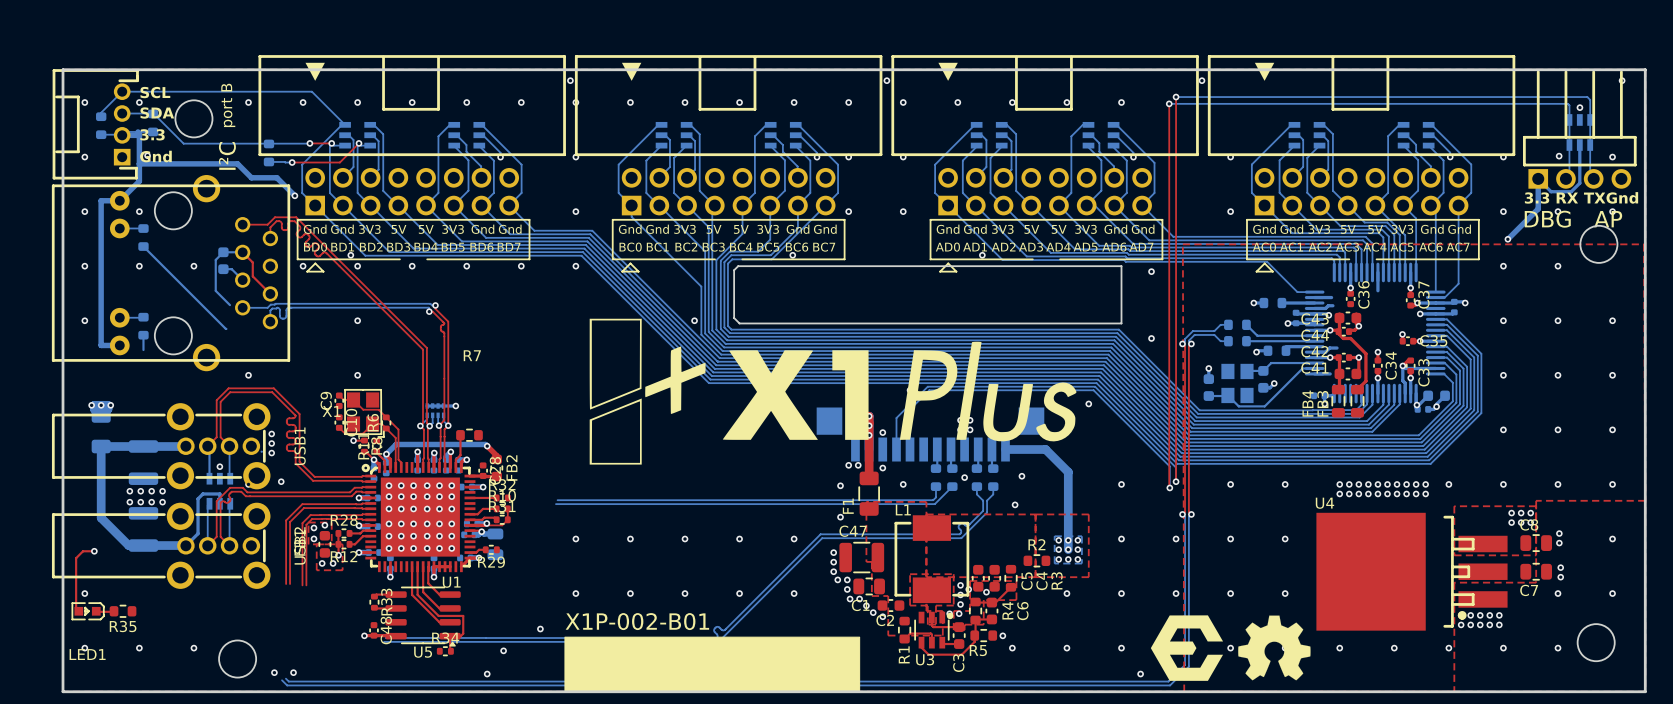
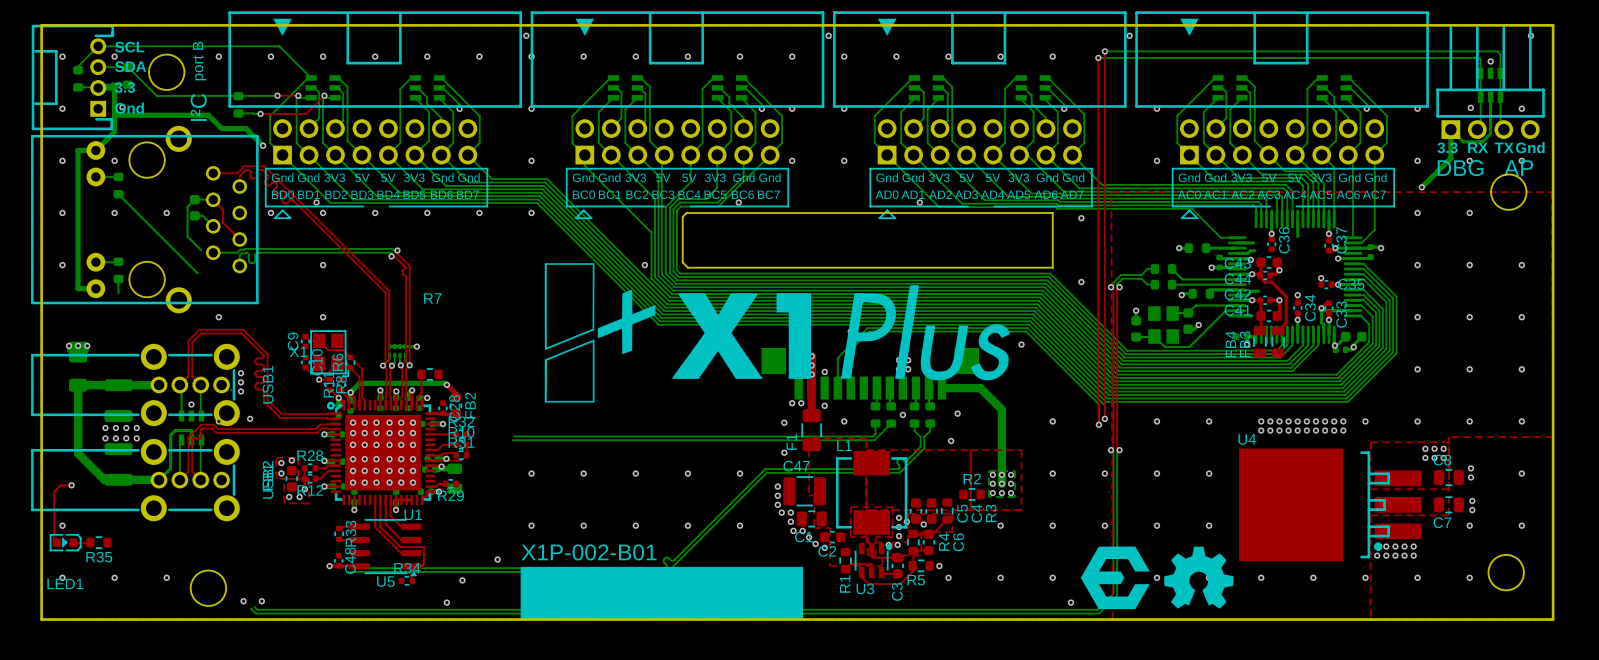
top track: (370, 503) (302, 504) (286, 520) (286, 584) -> none
top track: (370, 508) (304, 508) (290, 522) (290, 584) -> none
top track: (320, 514) (329, 514) -> none
top track: (370, 514) (329, 515) -> none
top track: (320, 515) (310, 515) (302, 523) (302, 585) -> none
top track: (322, 518) (327, 518) -> none
top track: (322, 519) (312, 519) (306, 524) (306, 585) -> none
top track: (327, 519) (370, 519) -> none

